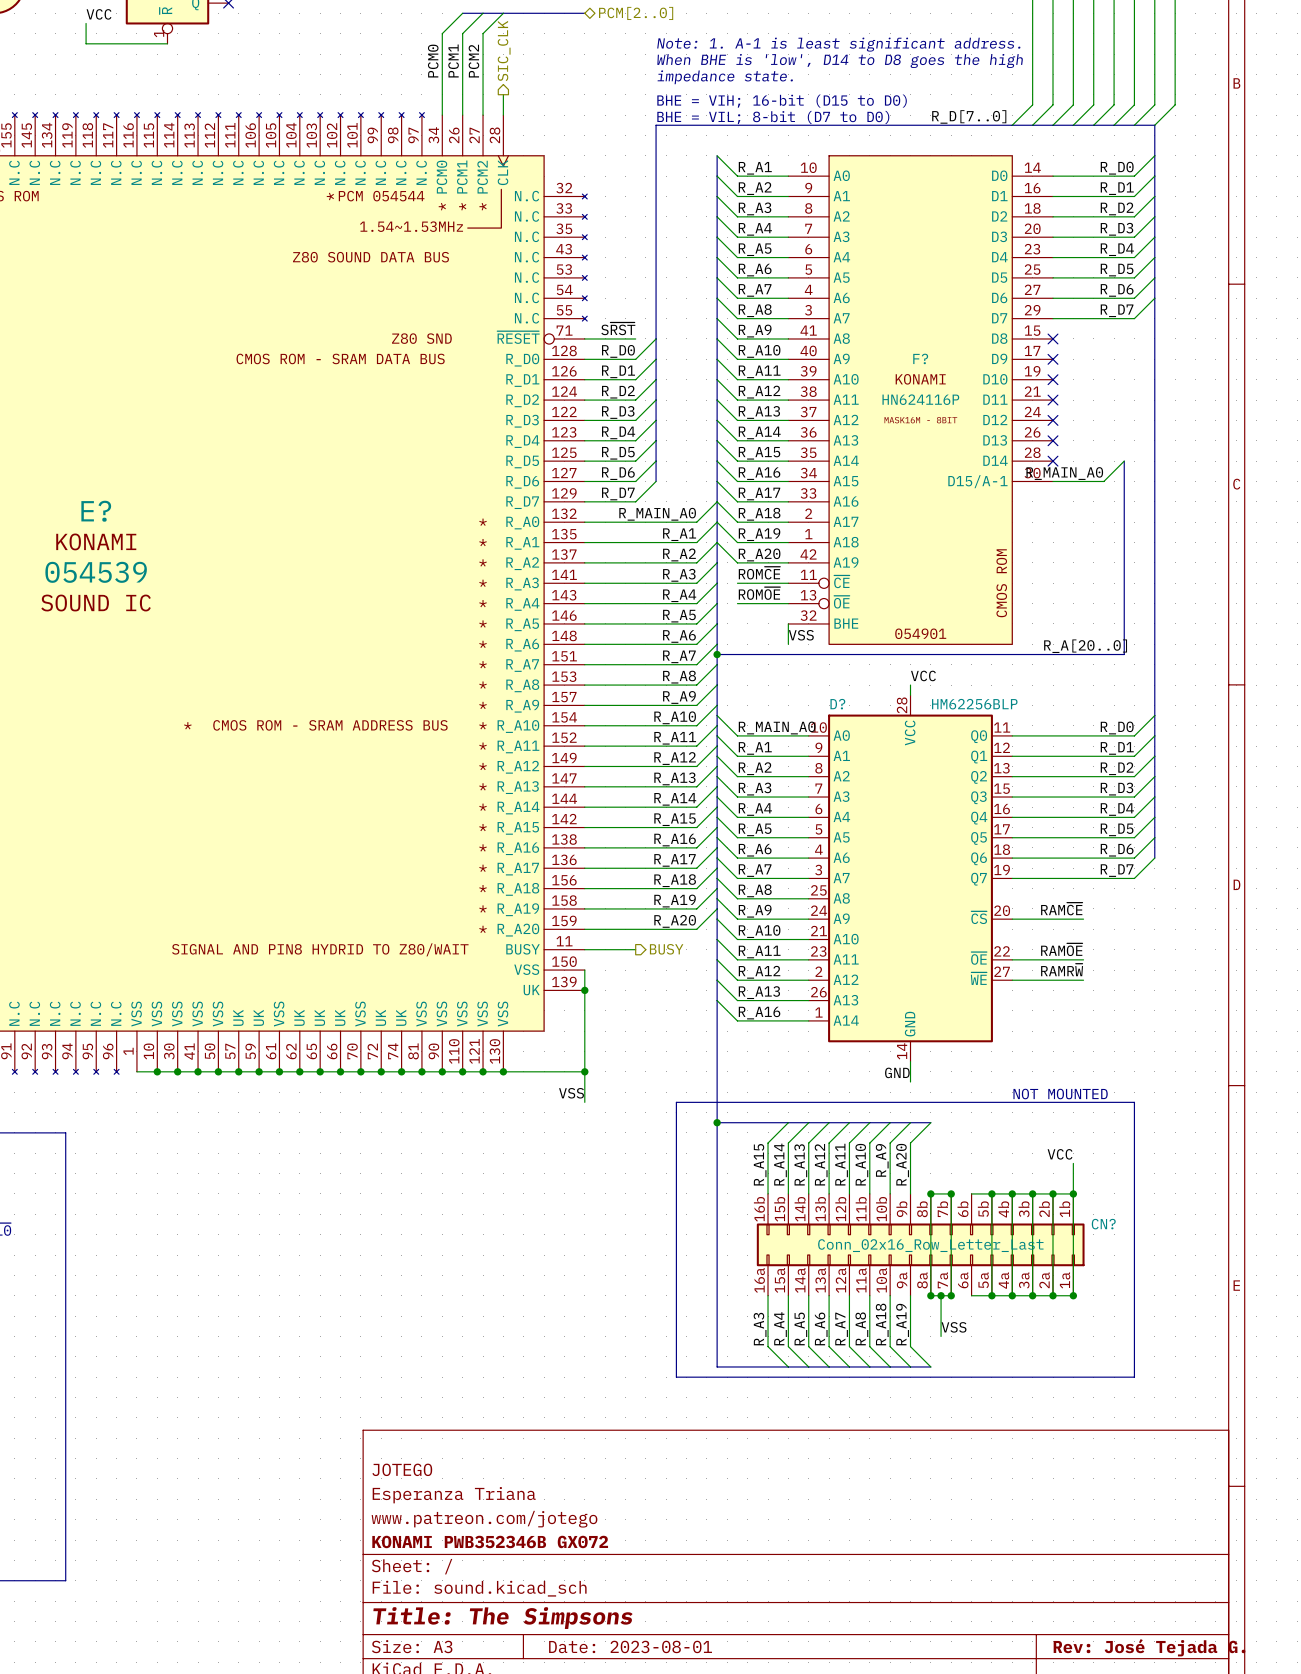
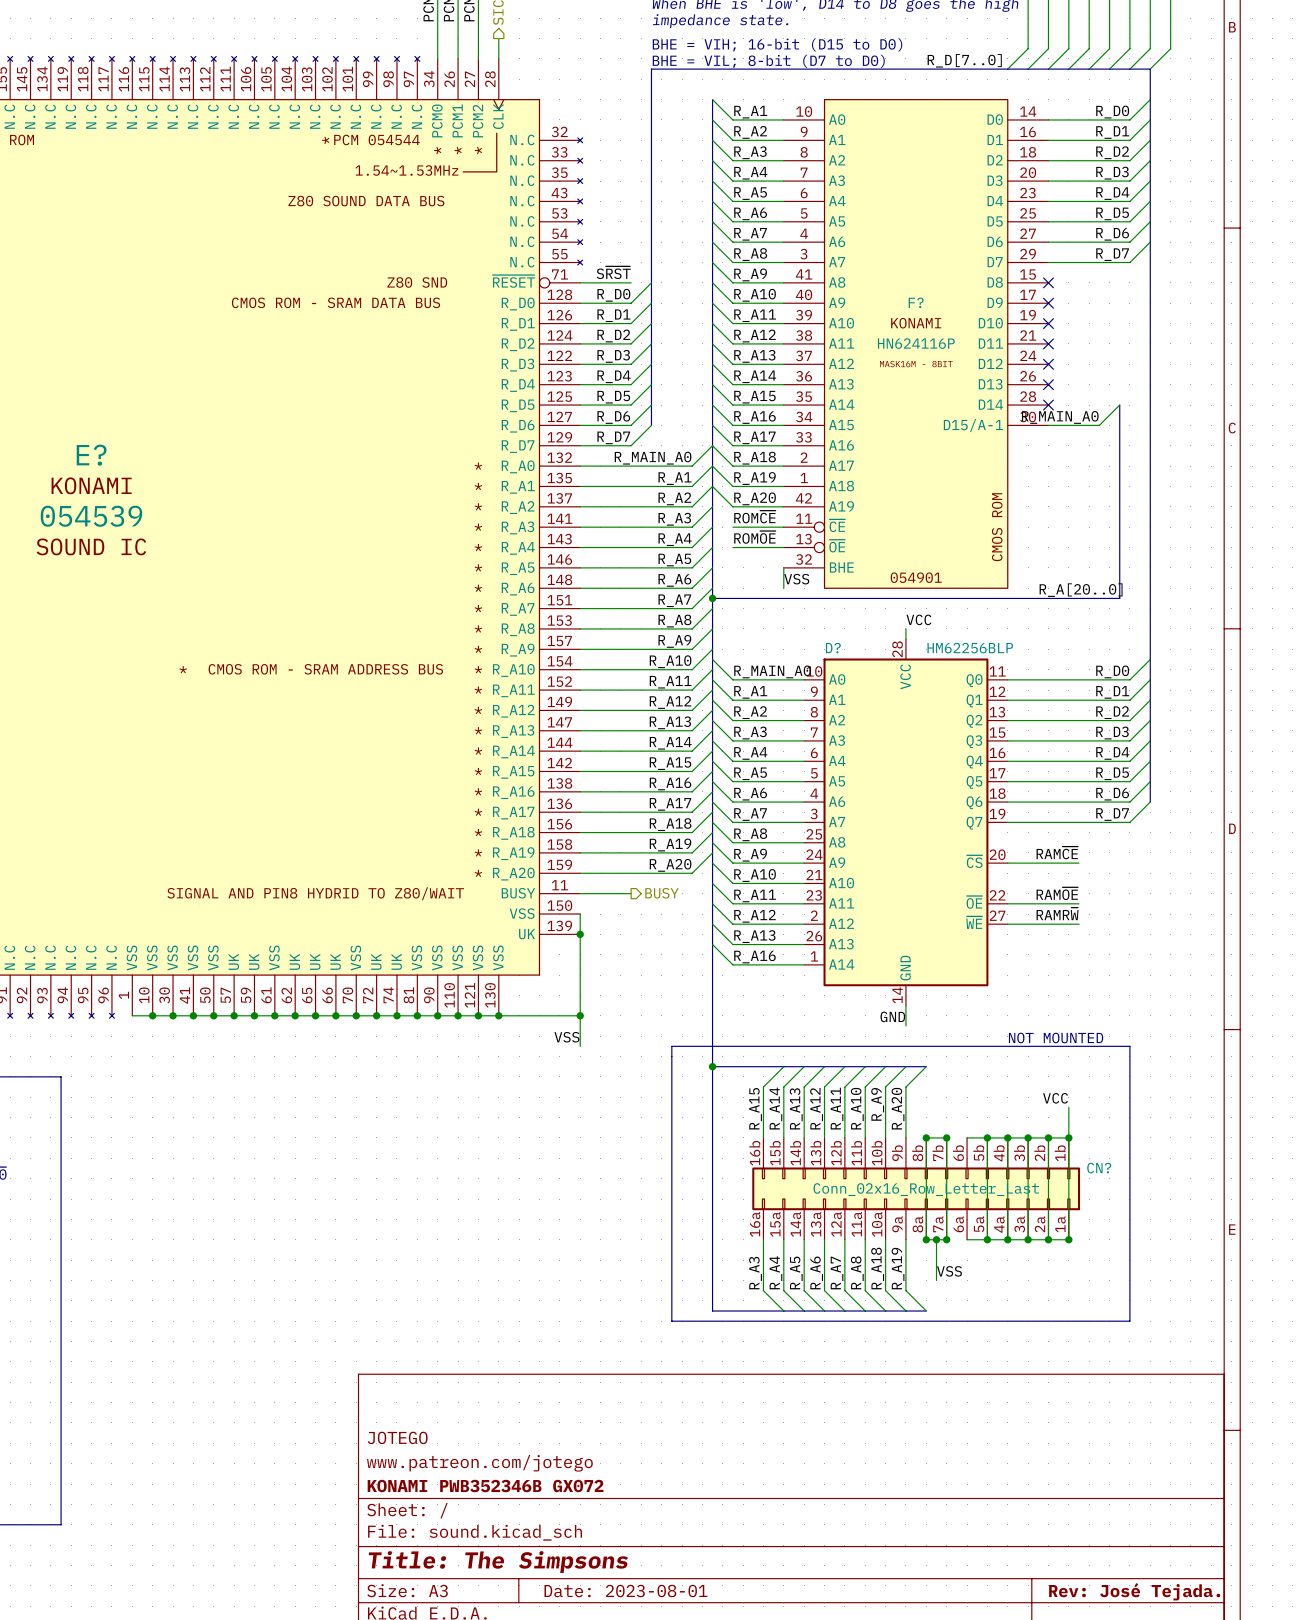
title block: JOTEGO (402, 1469) -> none
title block: Esperanza Triana (454, 1495) -> JOTEGO (397, 1437)
title block: Rev: José Tejada G. (1149, 1647) -> Rev: José Tejada. (1134, 1591)

